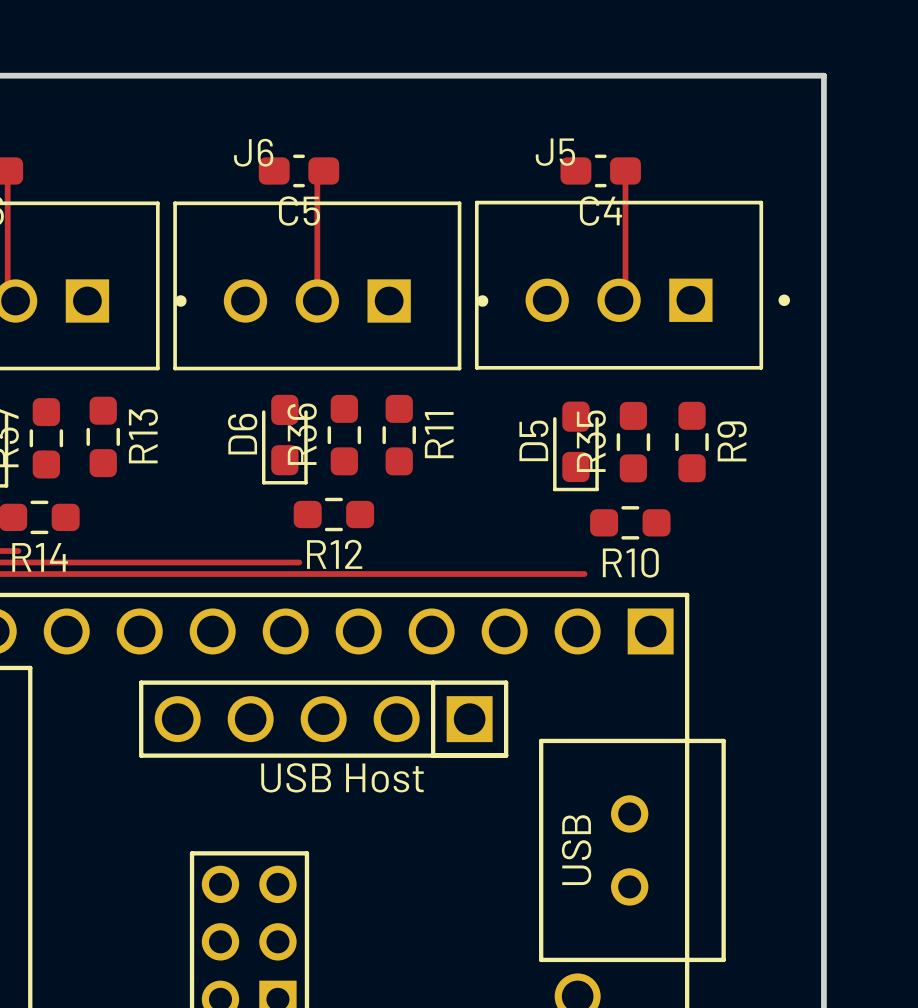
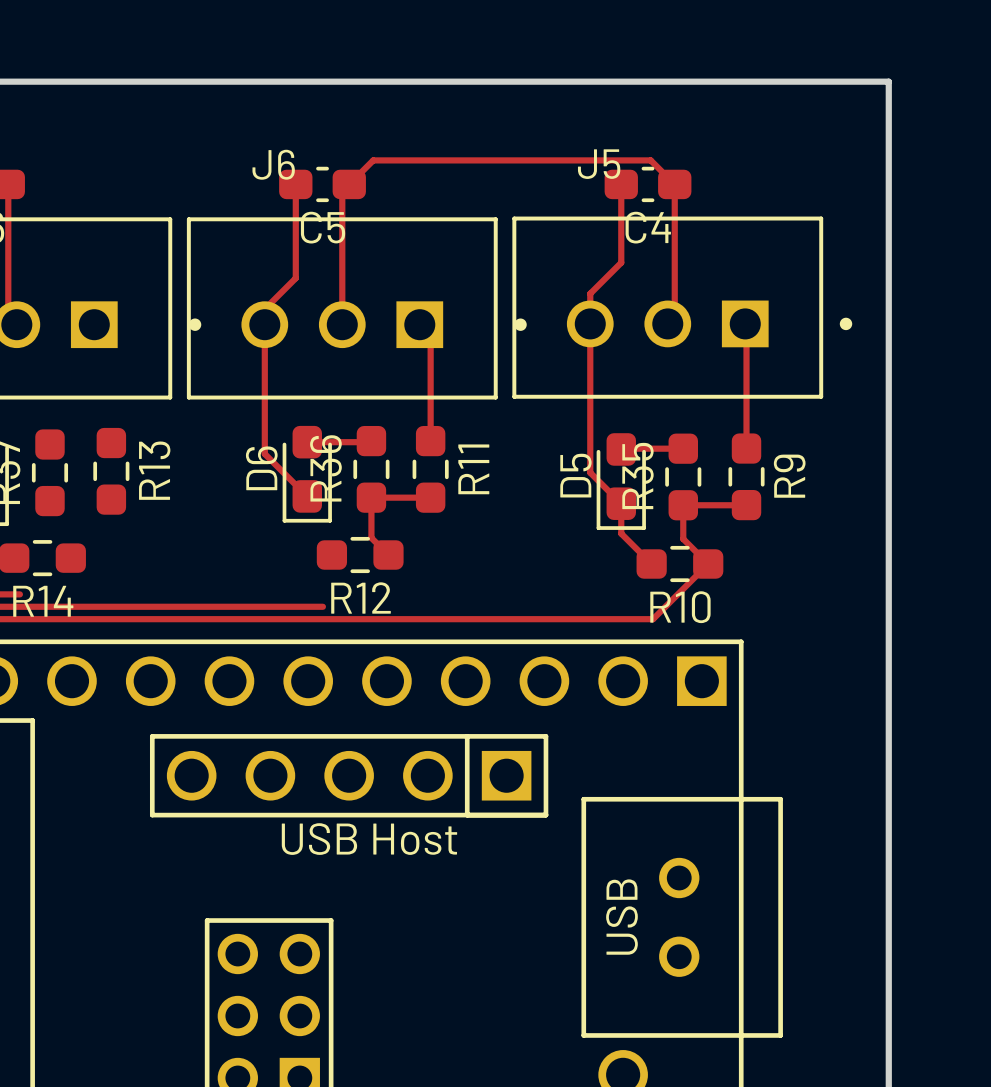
top track: none -> (295, 184) (295, 278) (264, 309) (264, 453) (307, 496)
top track: none -> (349, 184) (373, 160) (650, 160) (674, 184)
top track: none -> (621, 184) (621, 262) (590, 293) (590, 472) (621, 503) (621, 533) (651, 564)
top track: none -> (745, 323) (746, 448)
top track: none -> (419, 324) (430, 335) (430, 441)
top track: none -> (371, 441) (307, 442)
top track: none -> (683, 448) (621, 449)
top track: none -> (430, 497) (371, 497) (371, 537) (388, 555)
top track: none -> (746, 505) (683, 505) (683, 539) (708, 564) (653, 619) (630, 619)

